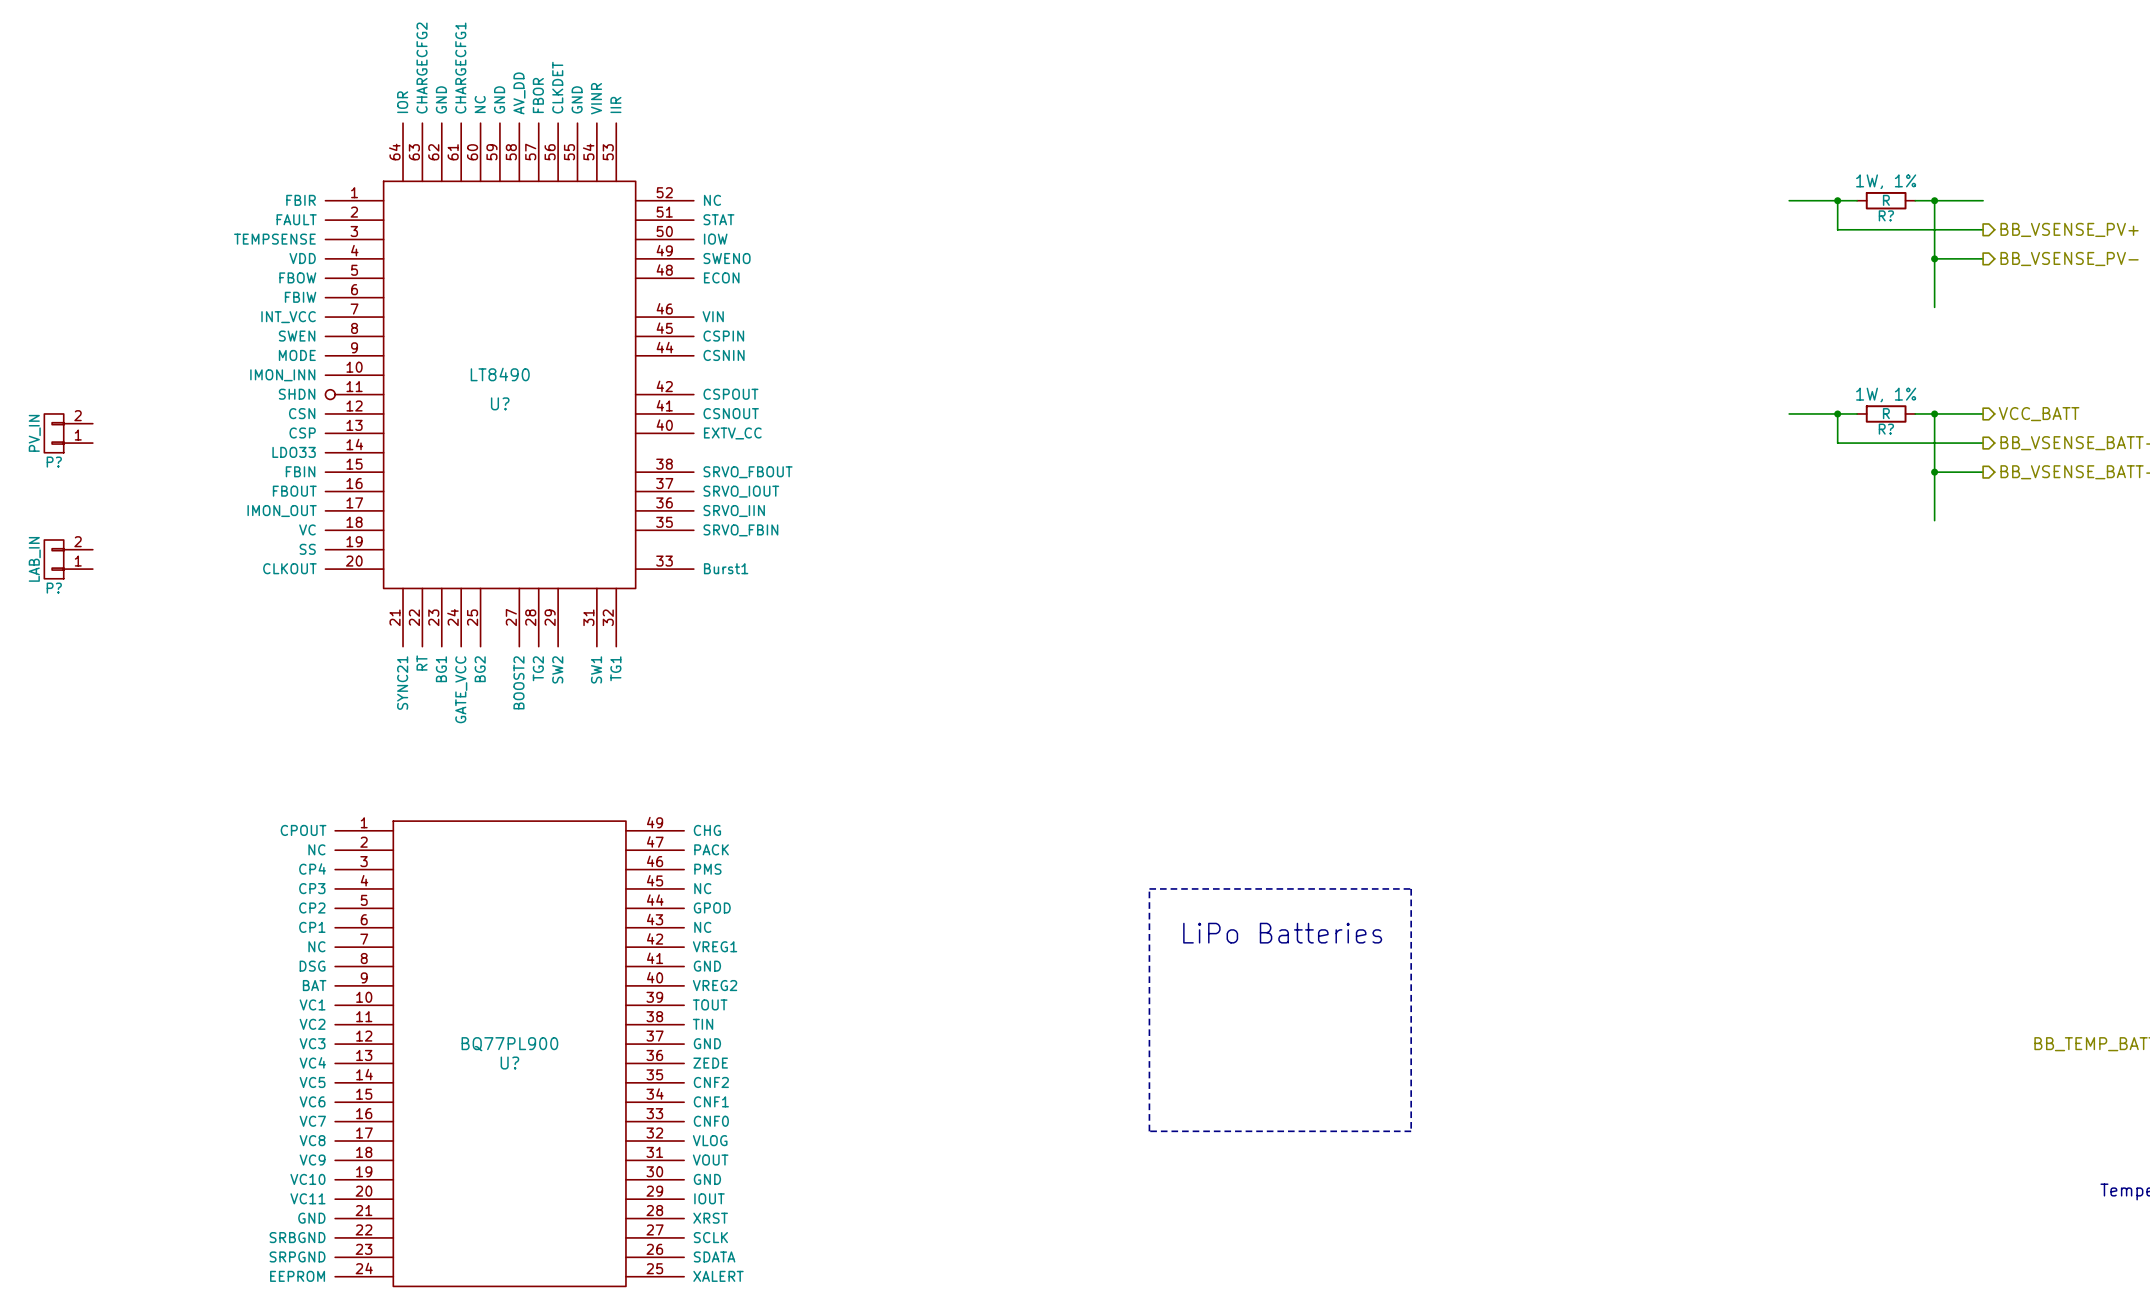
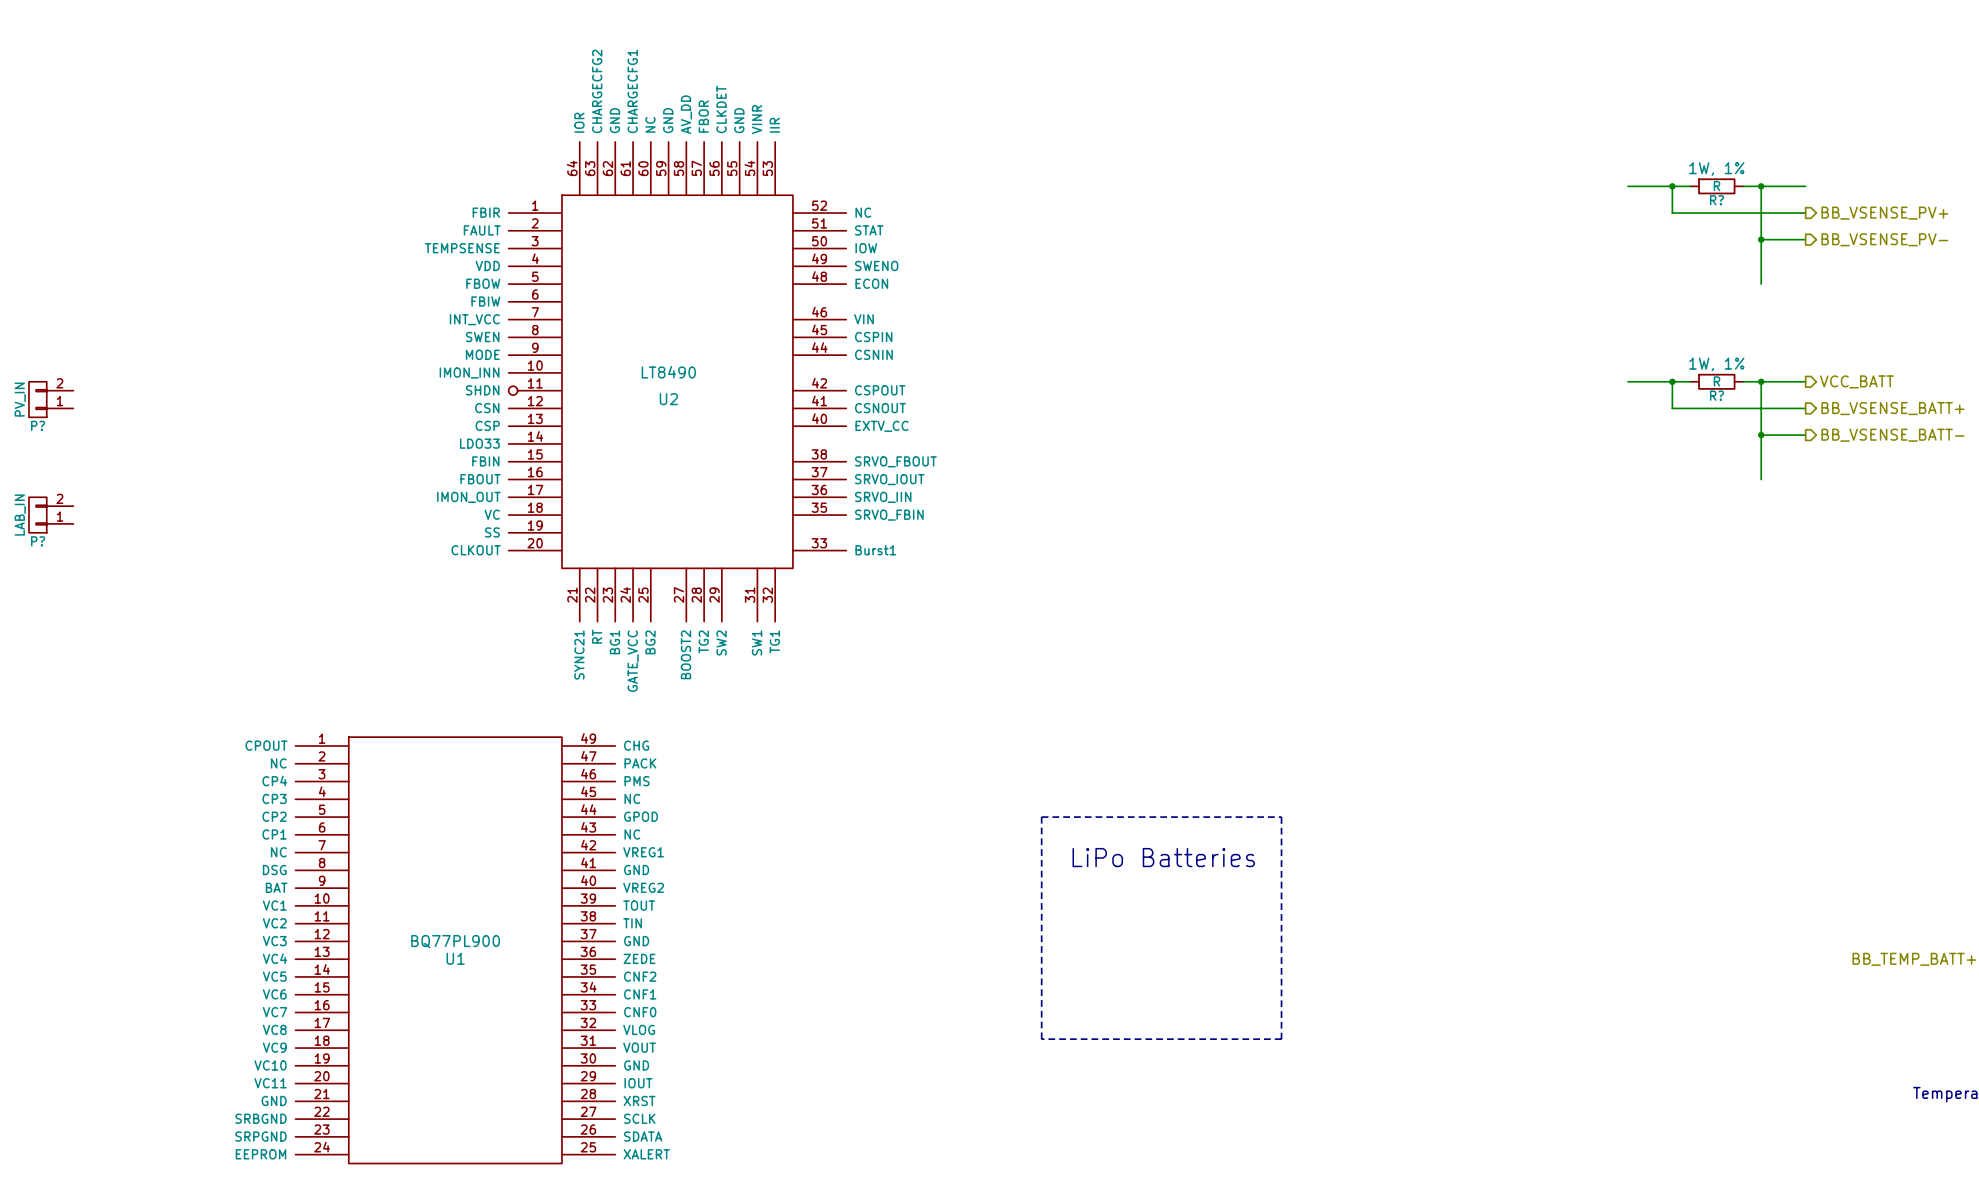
U?: LT8490 (509, 384) -> none
U2: none -> LT8490 (677, 381)
U1: none -> BQ77PL900 (455, 950)
U?: BQ77PL900 (509, 1053) -> none

